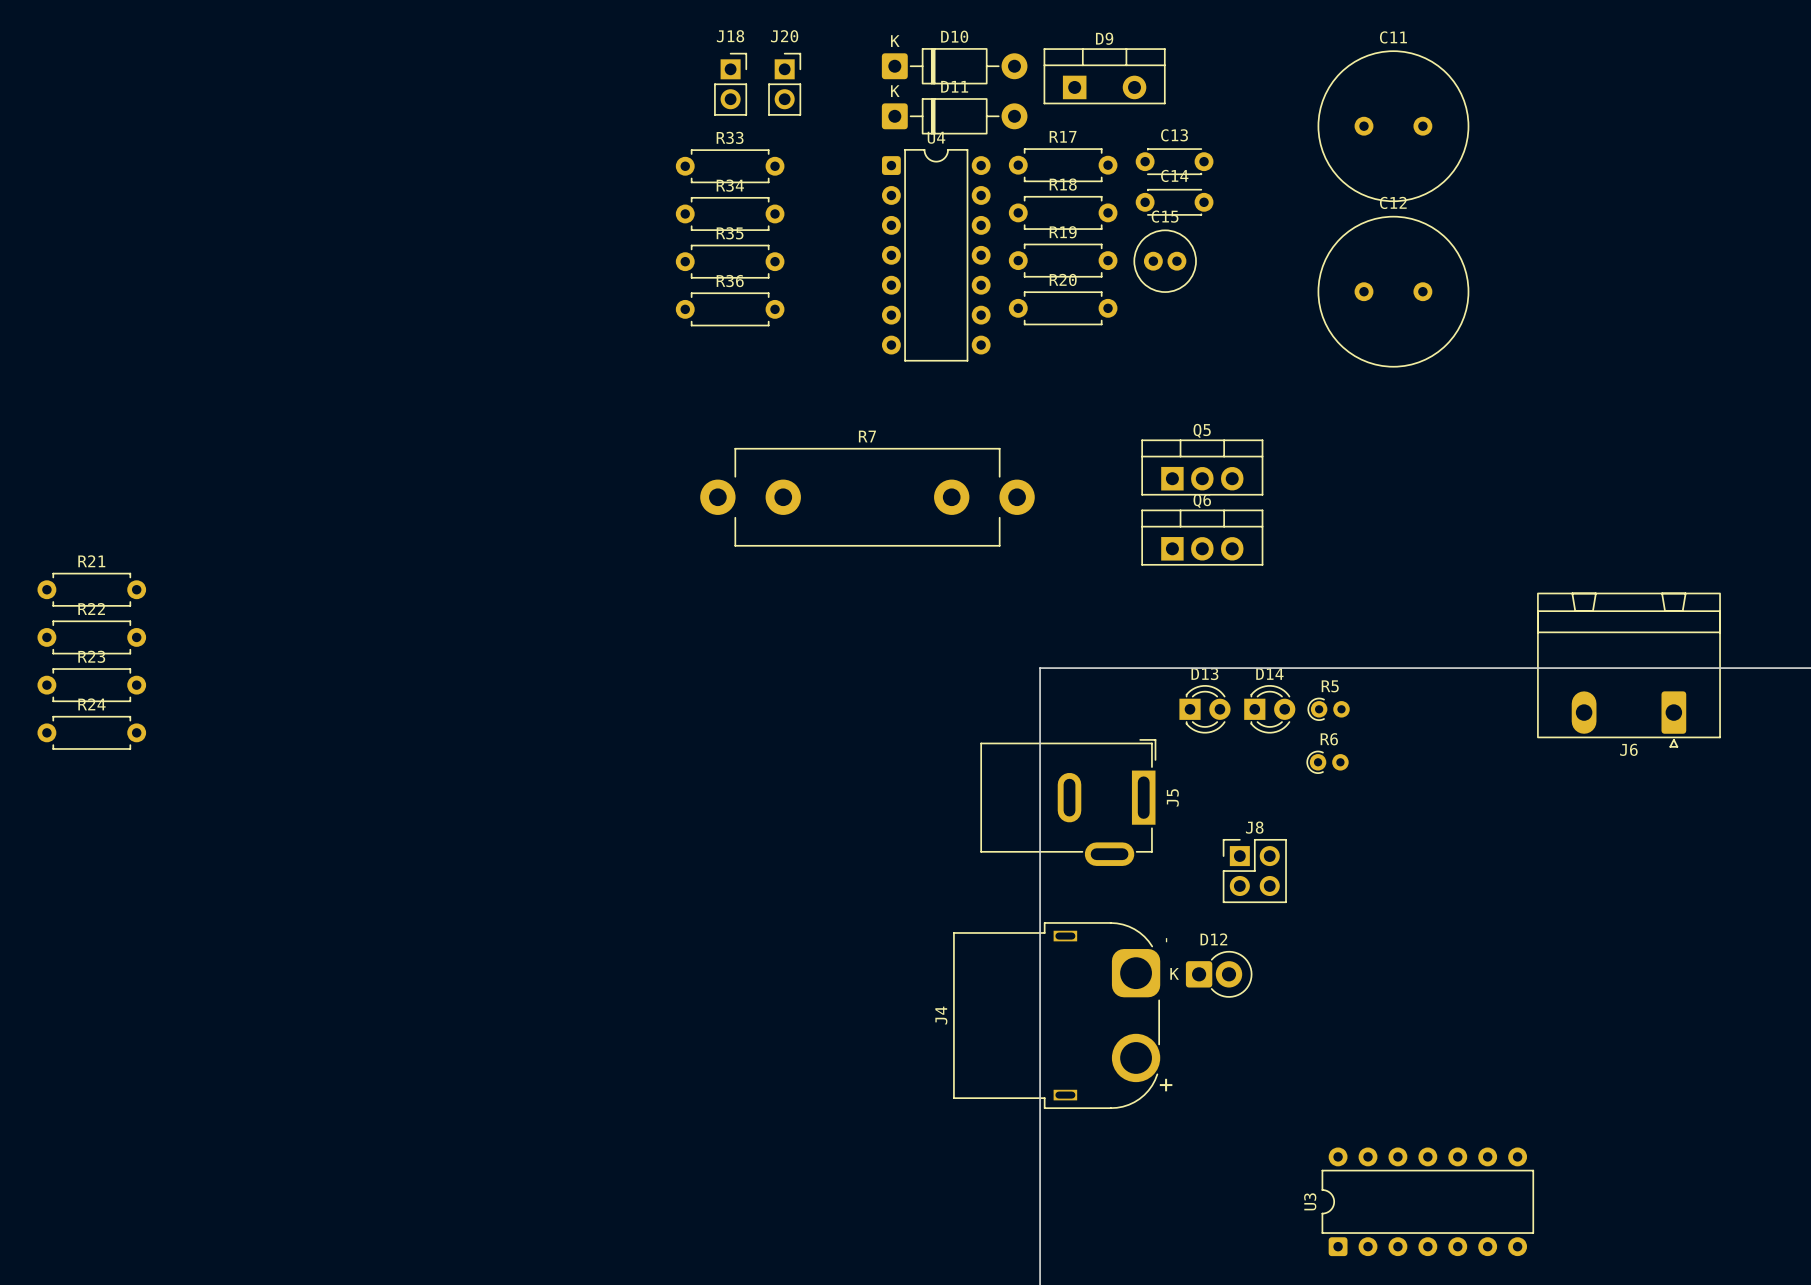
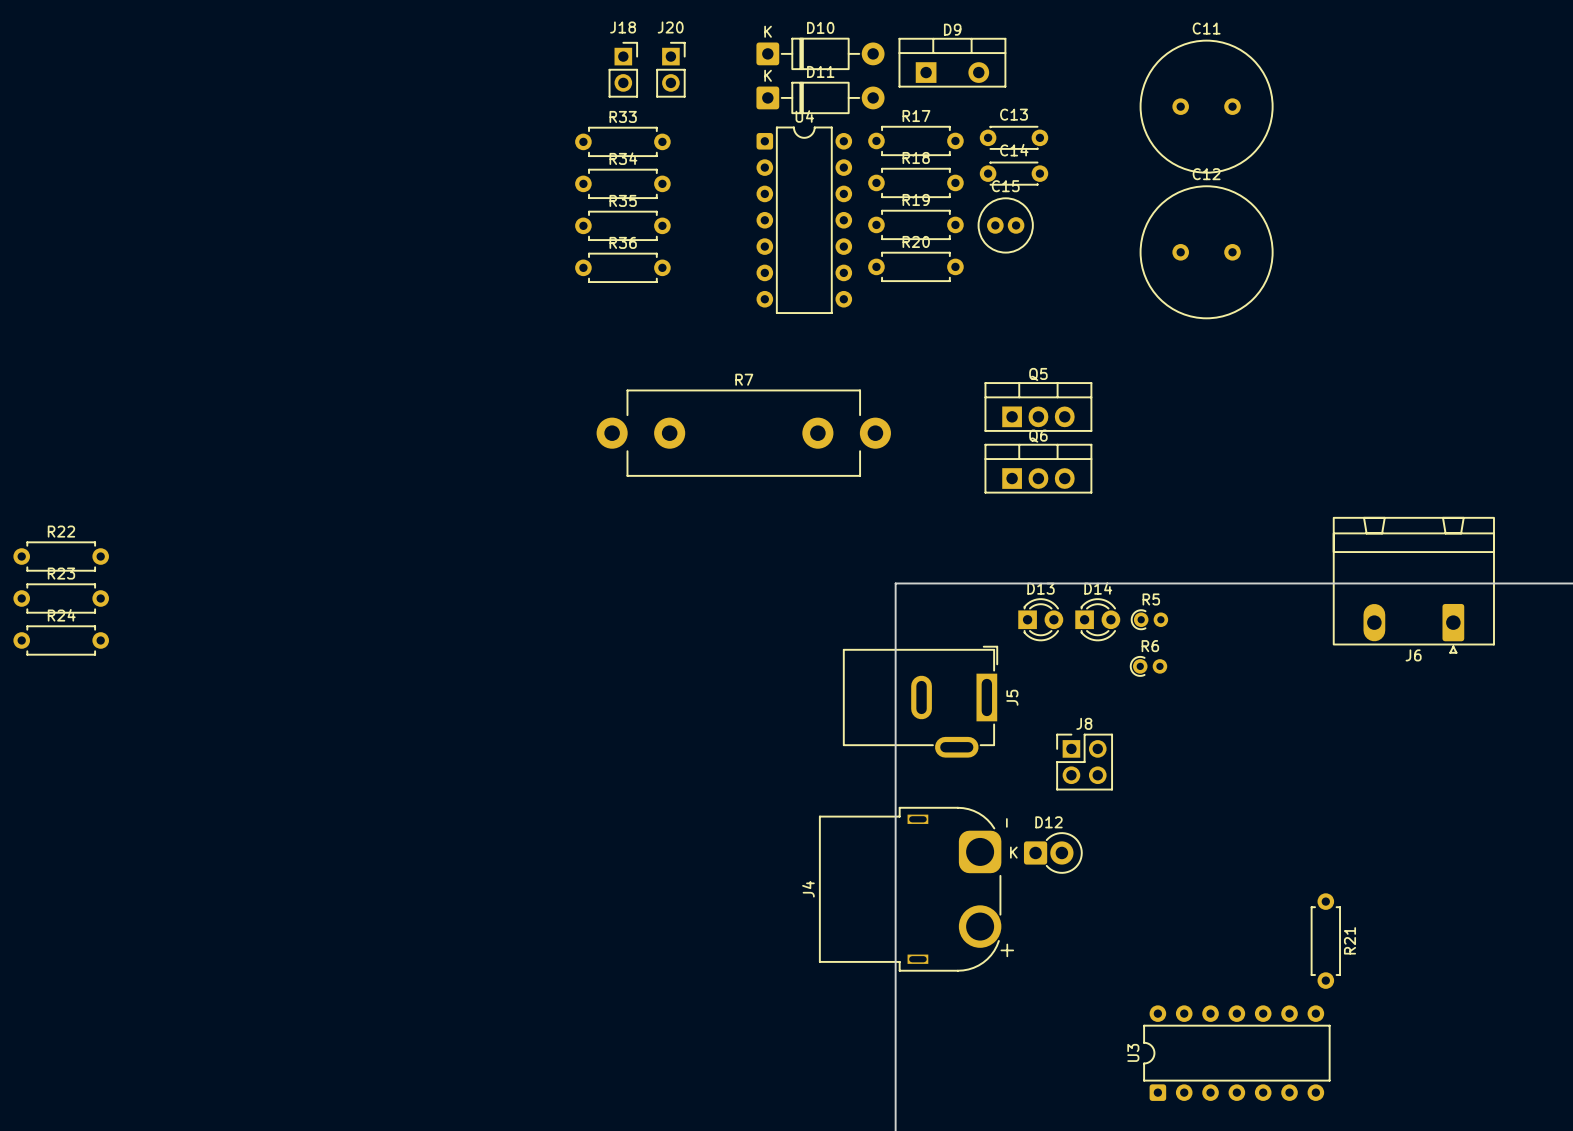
R21 rotation: 0° (91, 589) -> 90° clockwise (1325, 941)
R21 position: (91, 589) -> (1325, 941)

